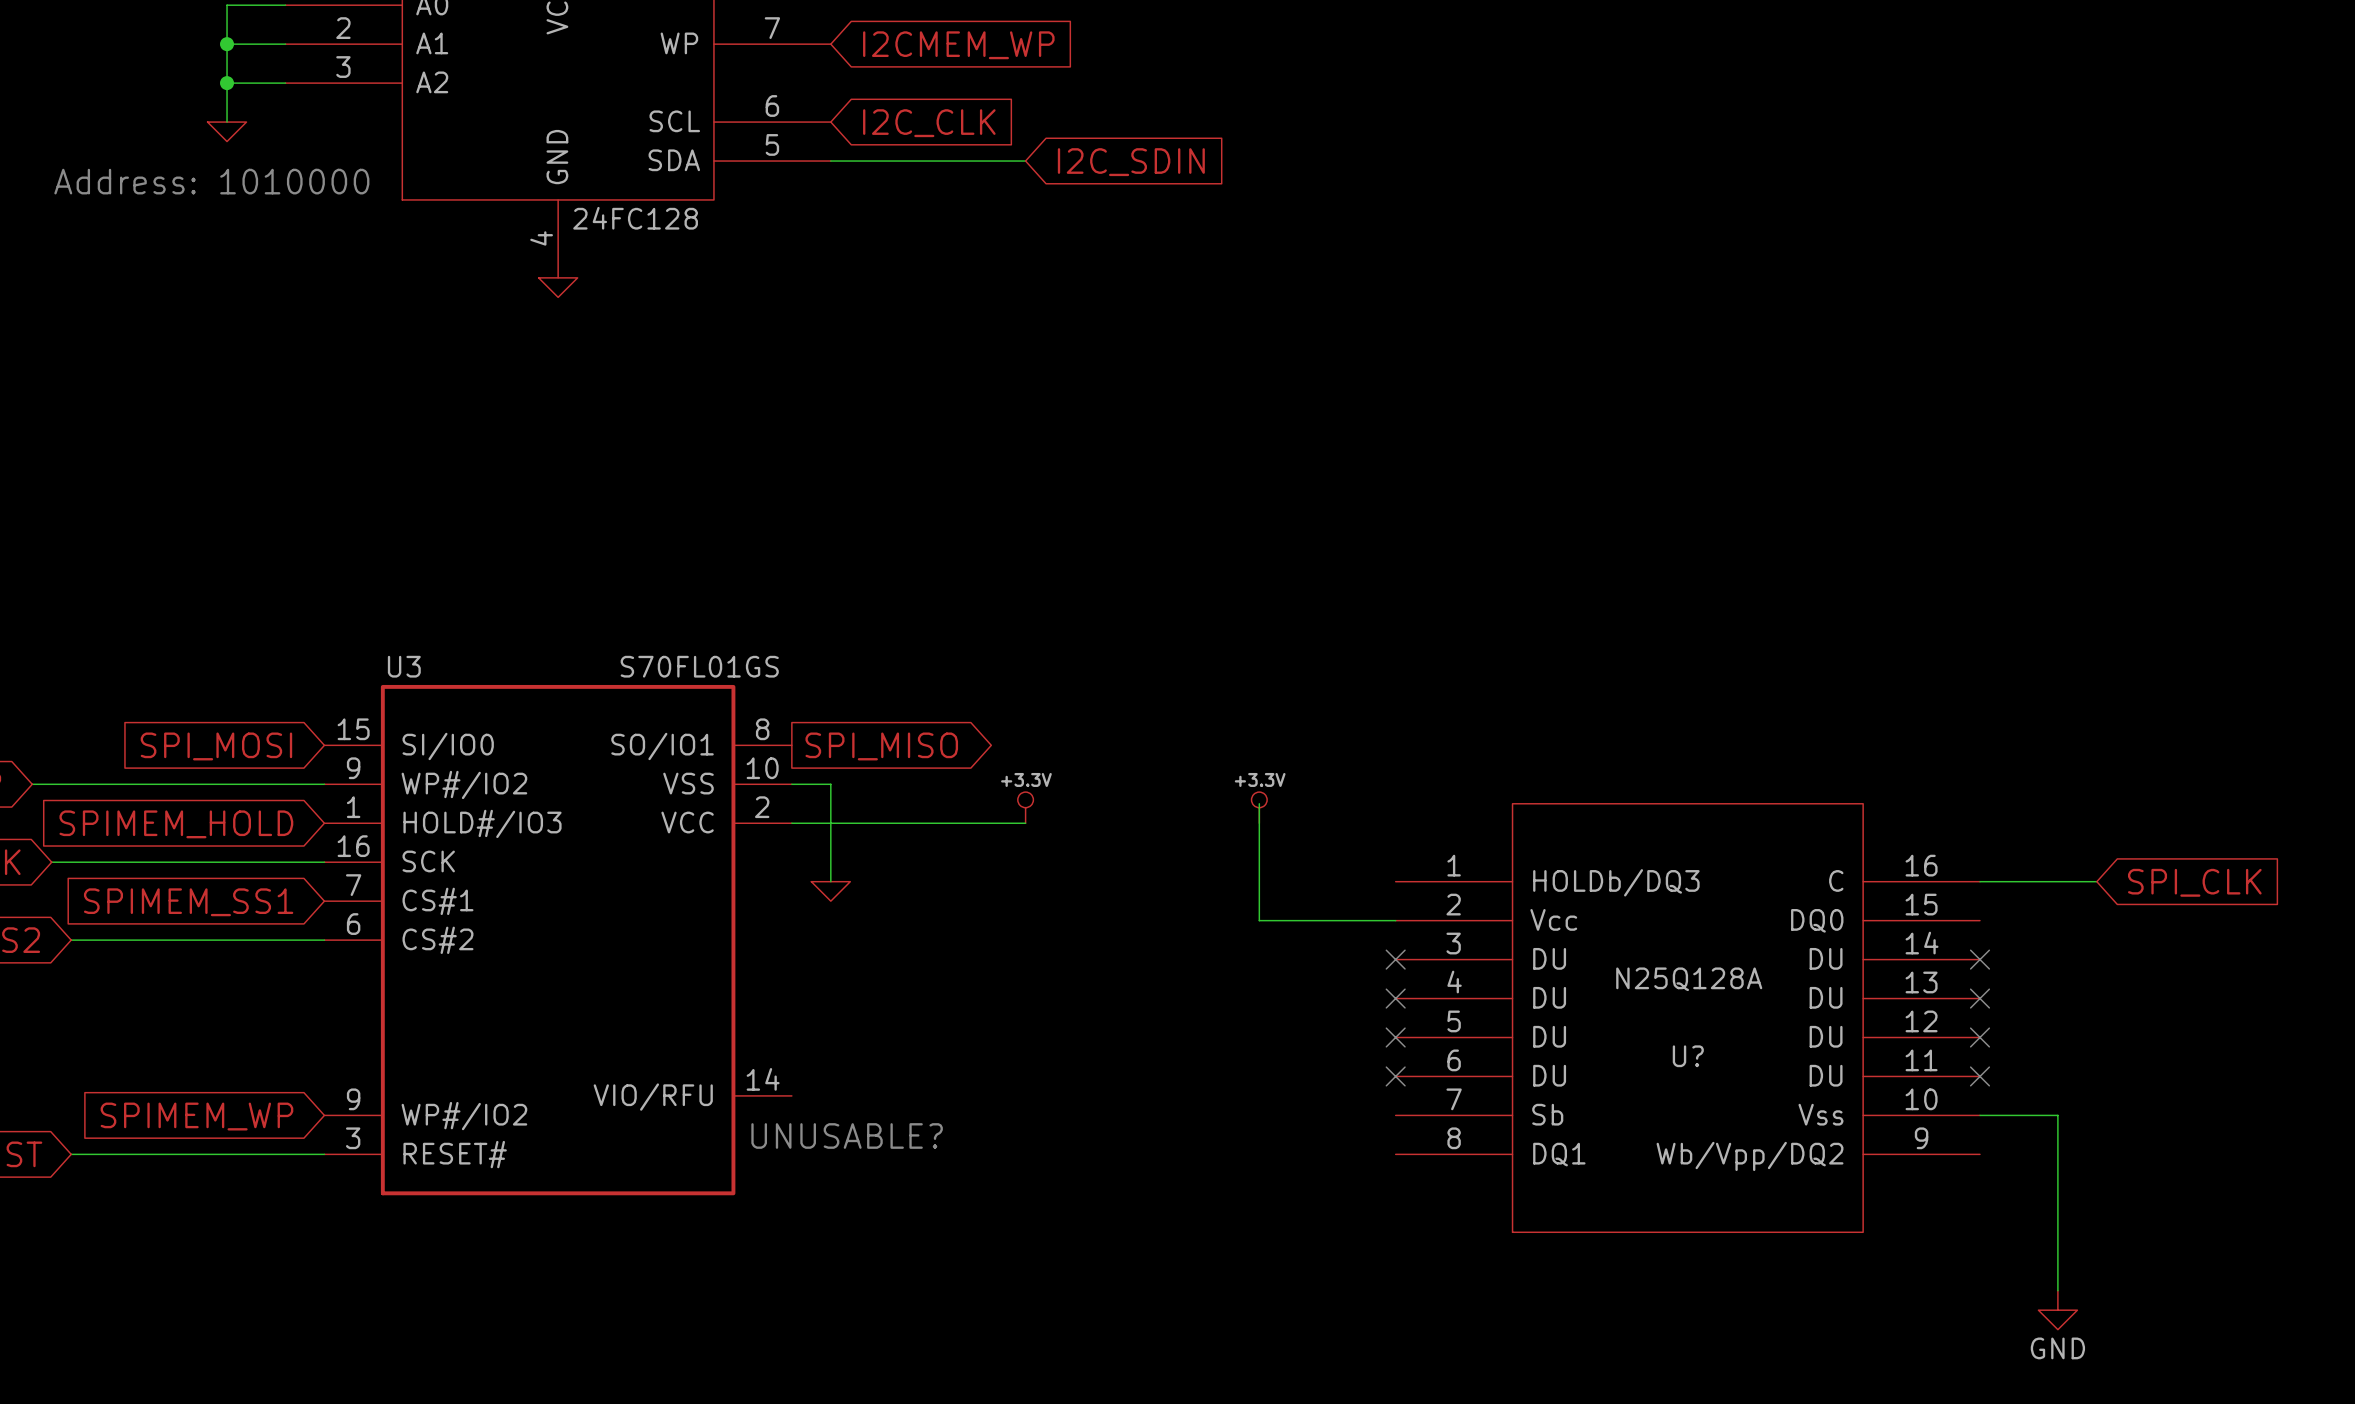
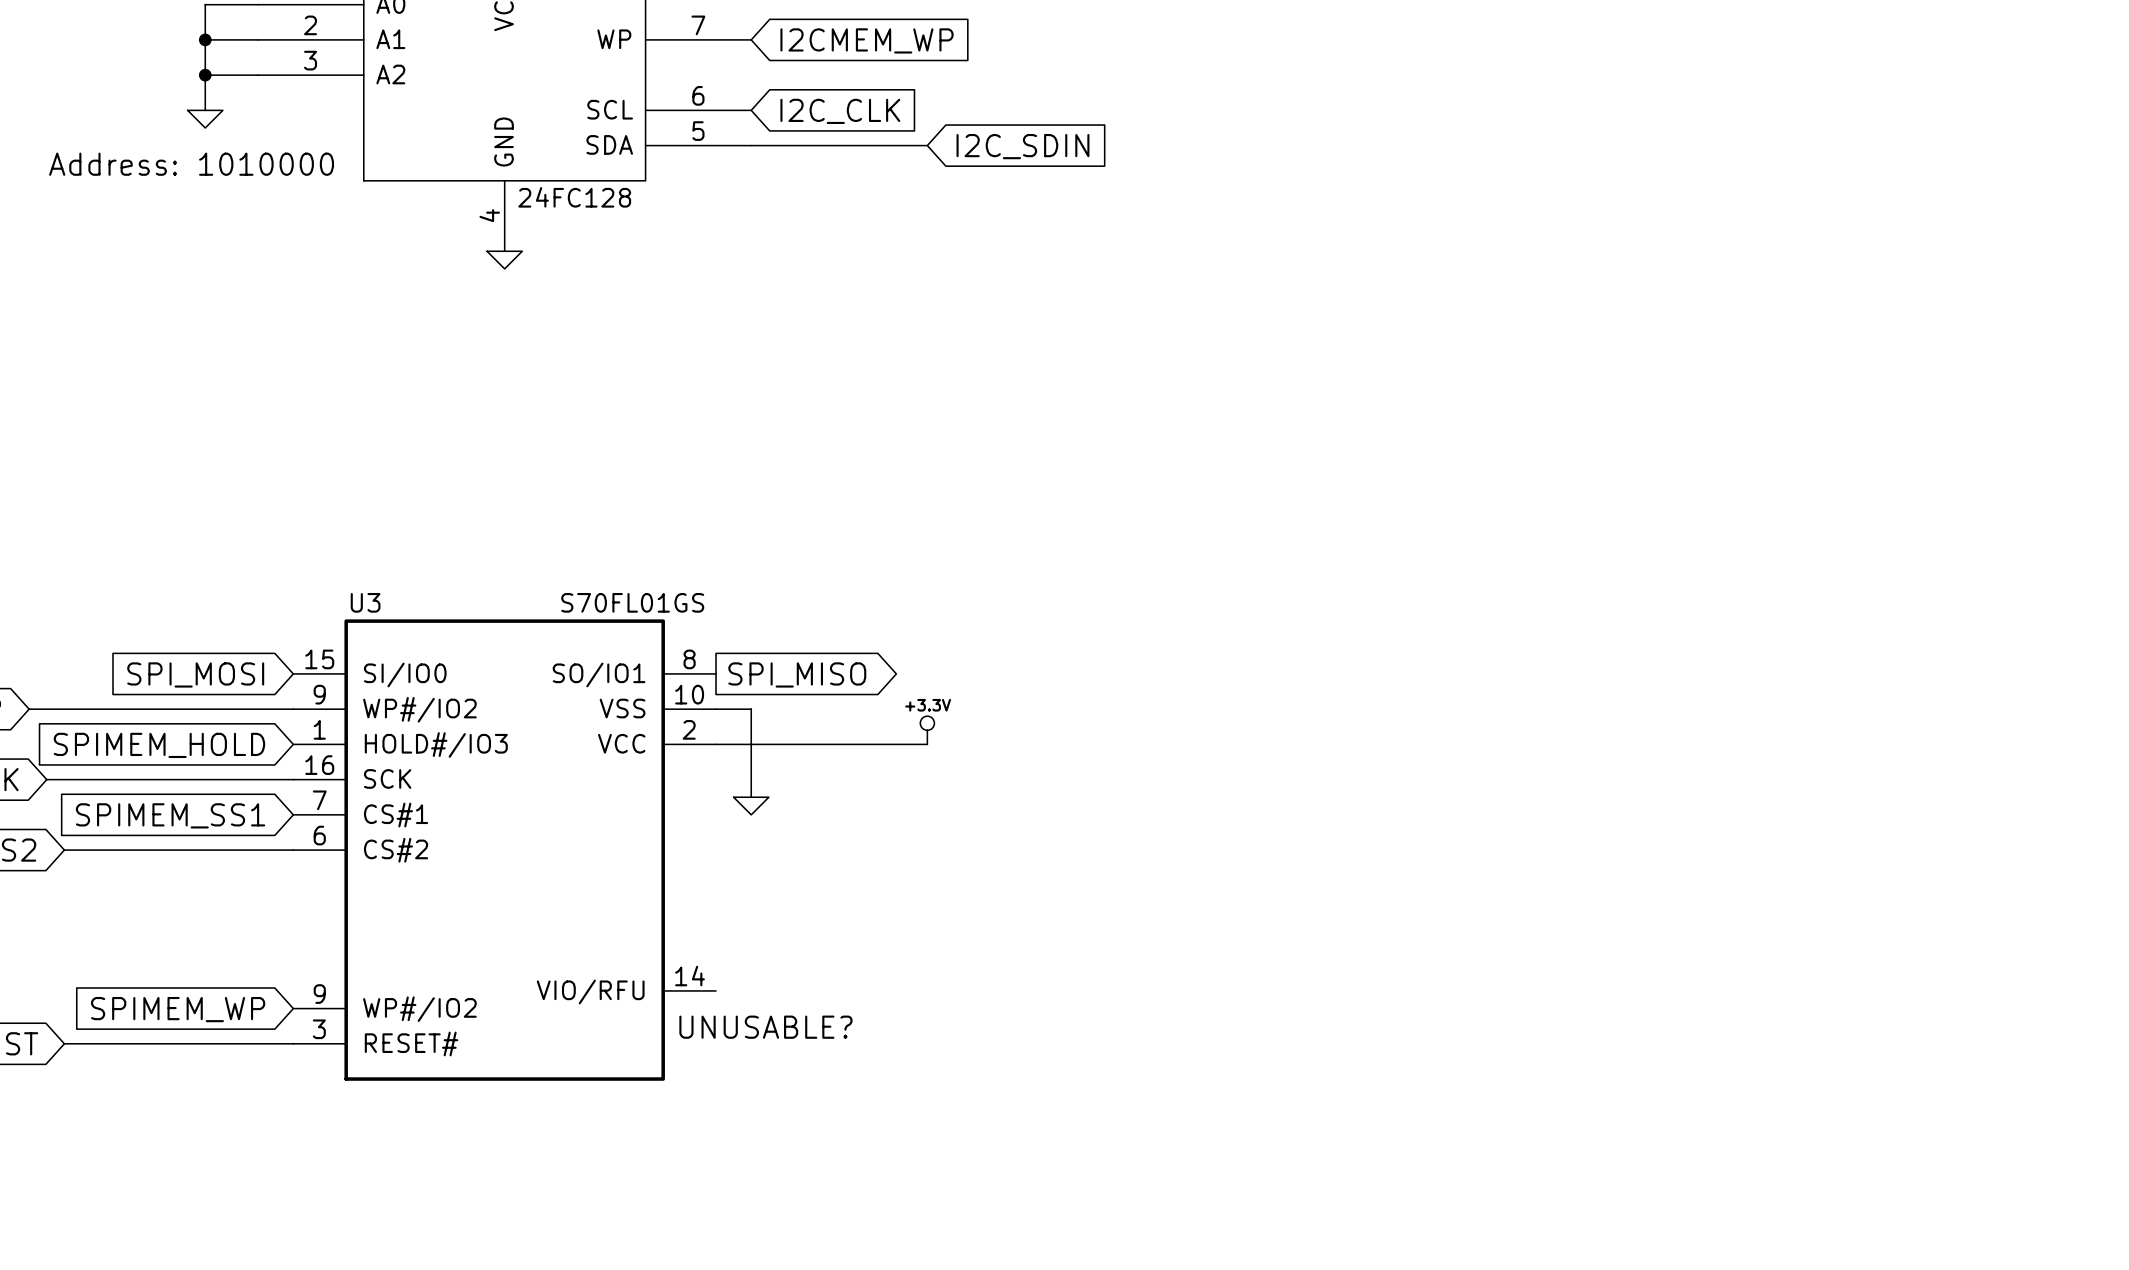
wire: (1259, 803) (1259, 920) (1395, 920) -> none
power symbol: +3.3V (1259, 807) -> none
wire: (1979, 881) (2096, 881) -> none
global label: SPI_CLK (2194, 882) -> none
no-connect mark: (1395, 959) -> none
no-connect mark: (1979, 959) -> none
no-connect mark: (1395, 998) -> none
no-connect mark: (1979, 998) -> none
U?: N25Q128A (1687, 1018) -> none
no-connect mark: (1395, 1037) -> none
no-connect mark: (1979, 1037) -> none
no-connect mark: (1395, 1076) -> none
no-connect mark: (1979, 1076) -> none
wire: (1979, 1115) (2057, 1115) (2057, 1290) -> none
power symbol: GND (2057, 1310) -> none

